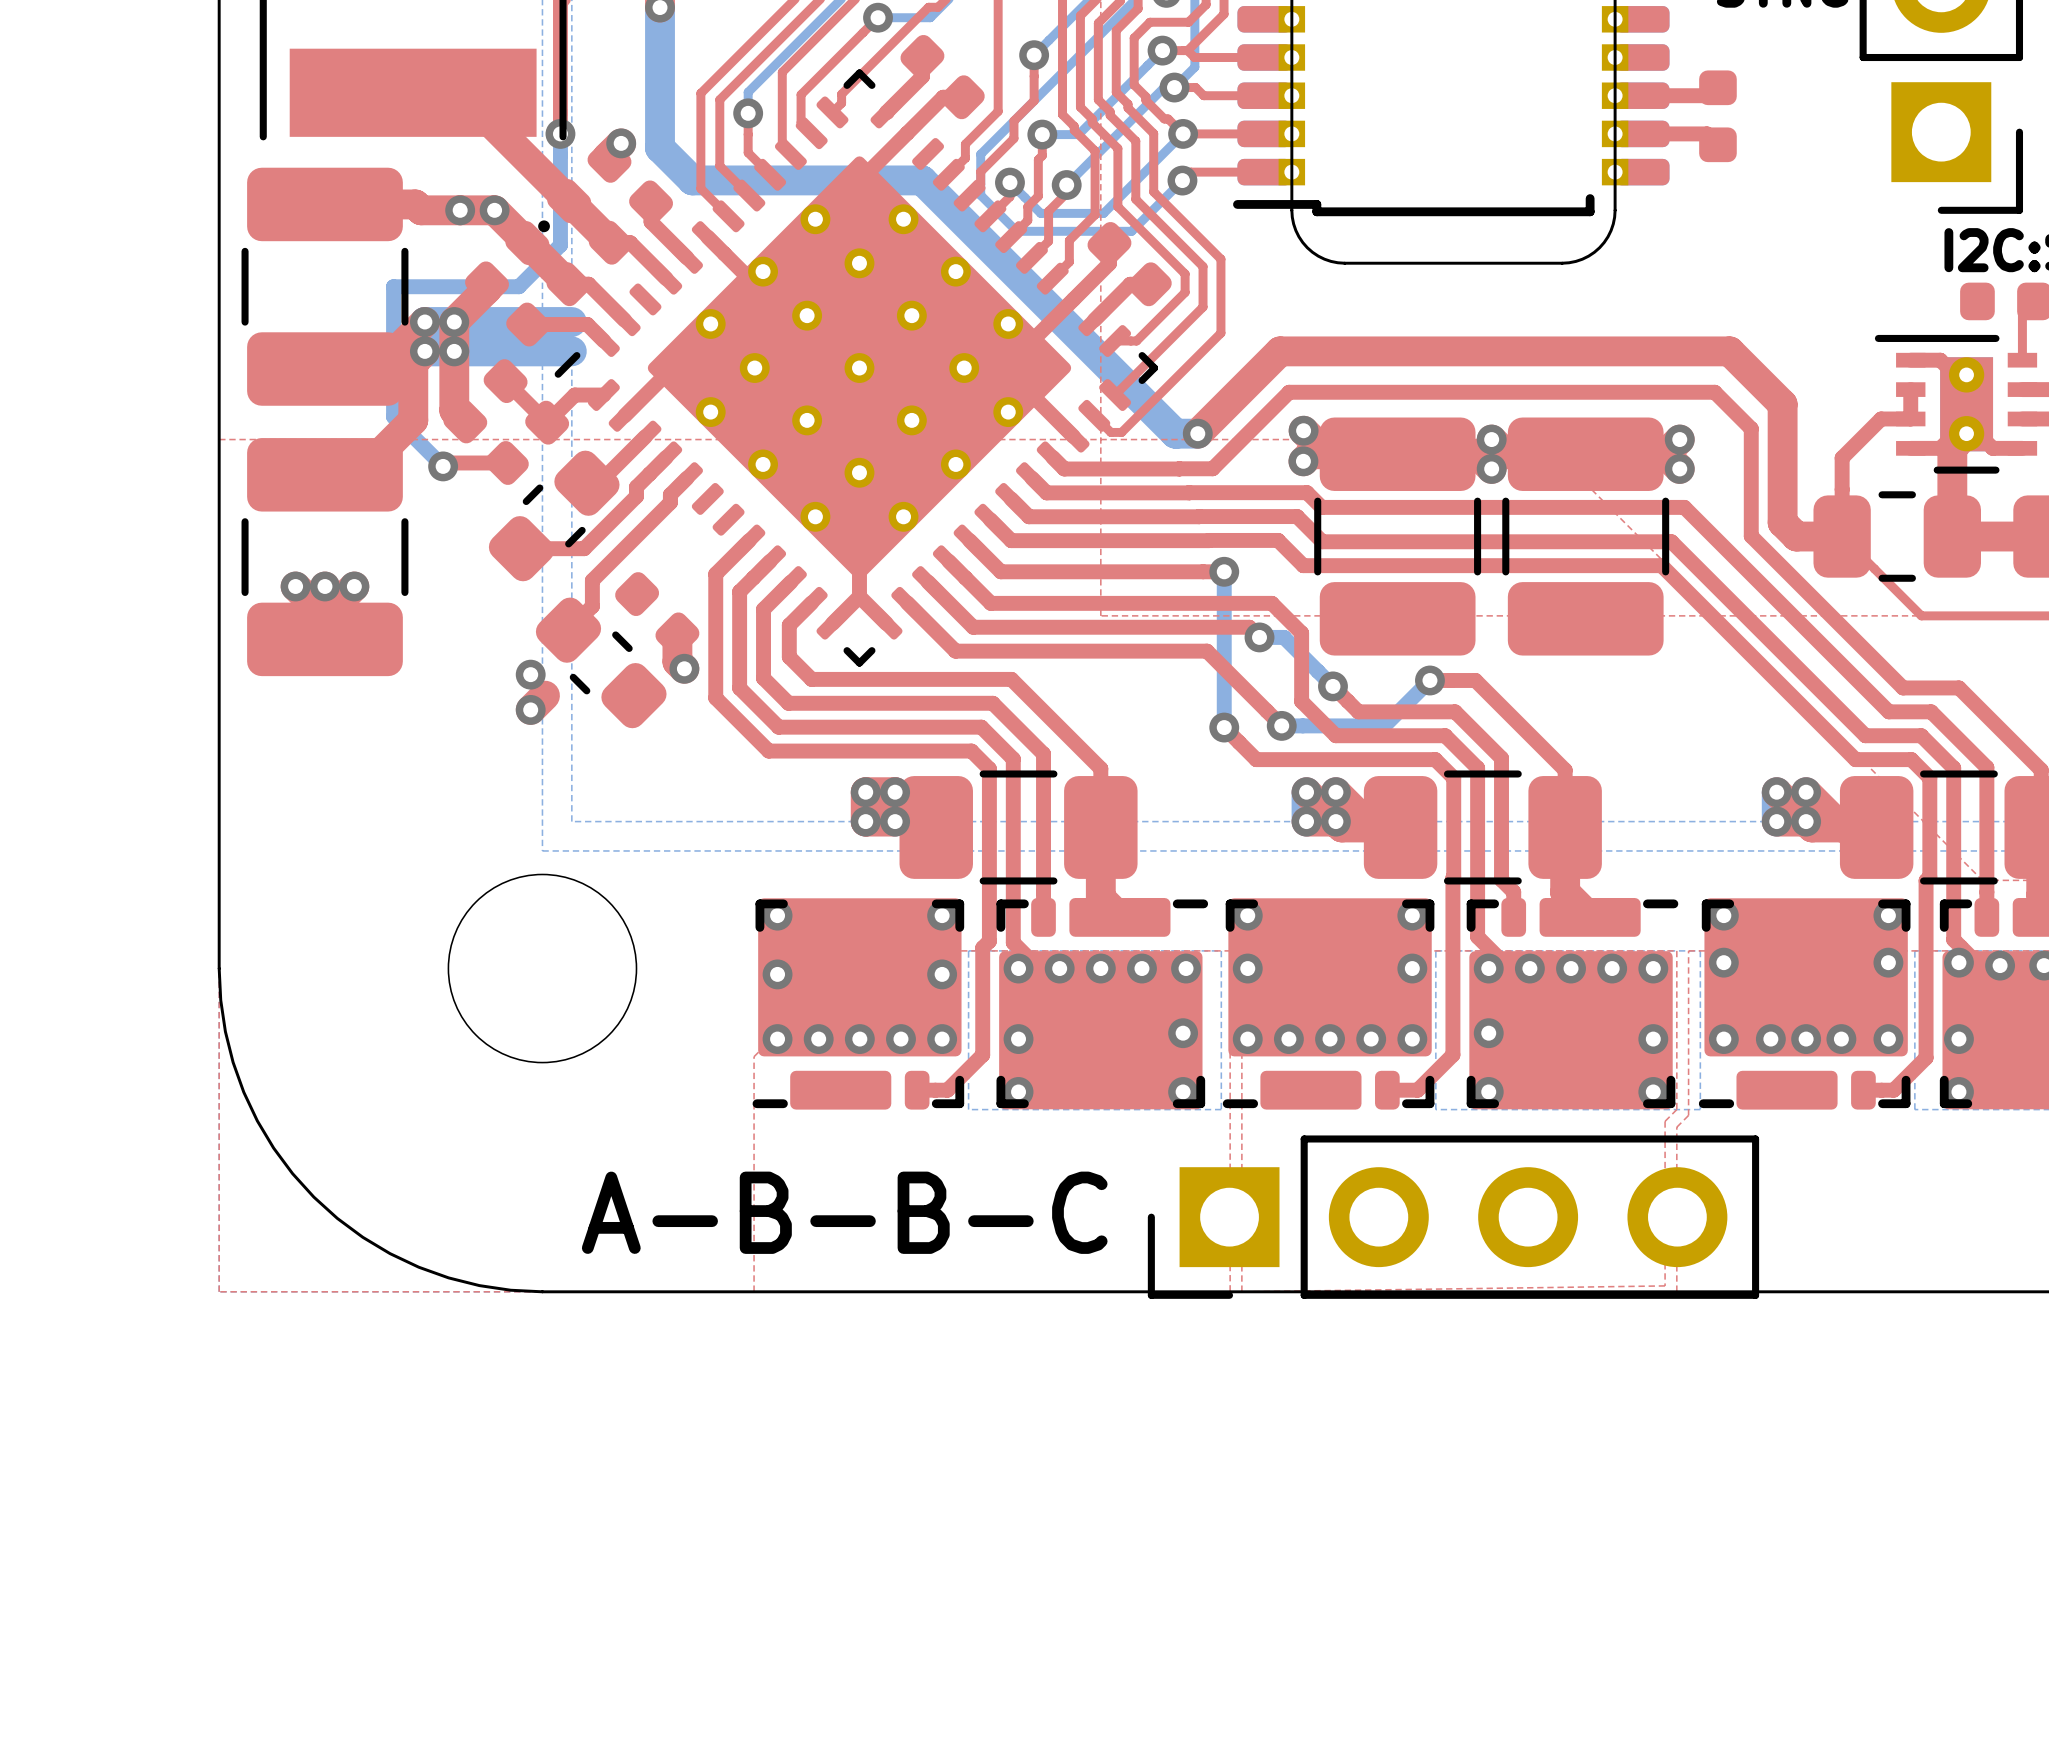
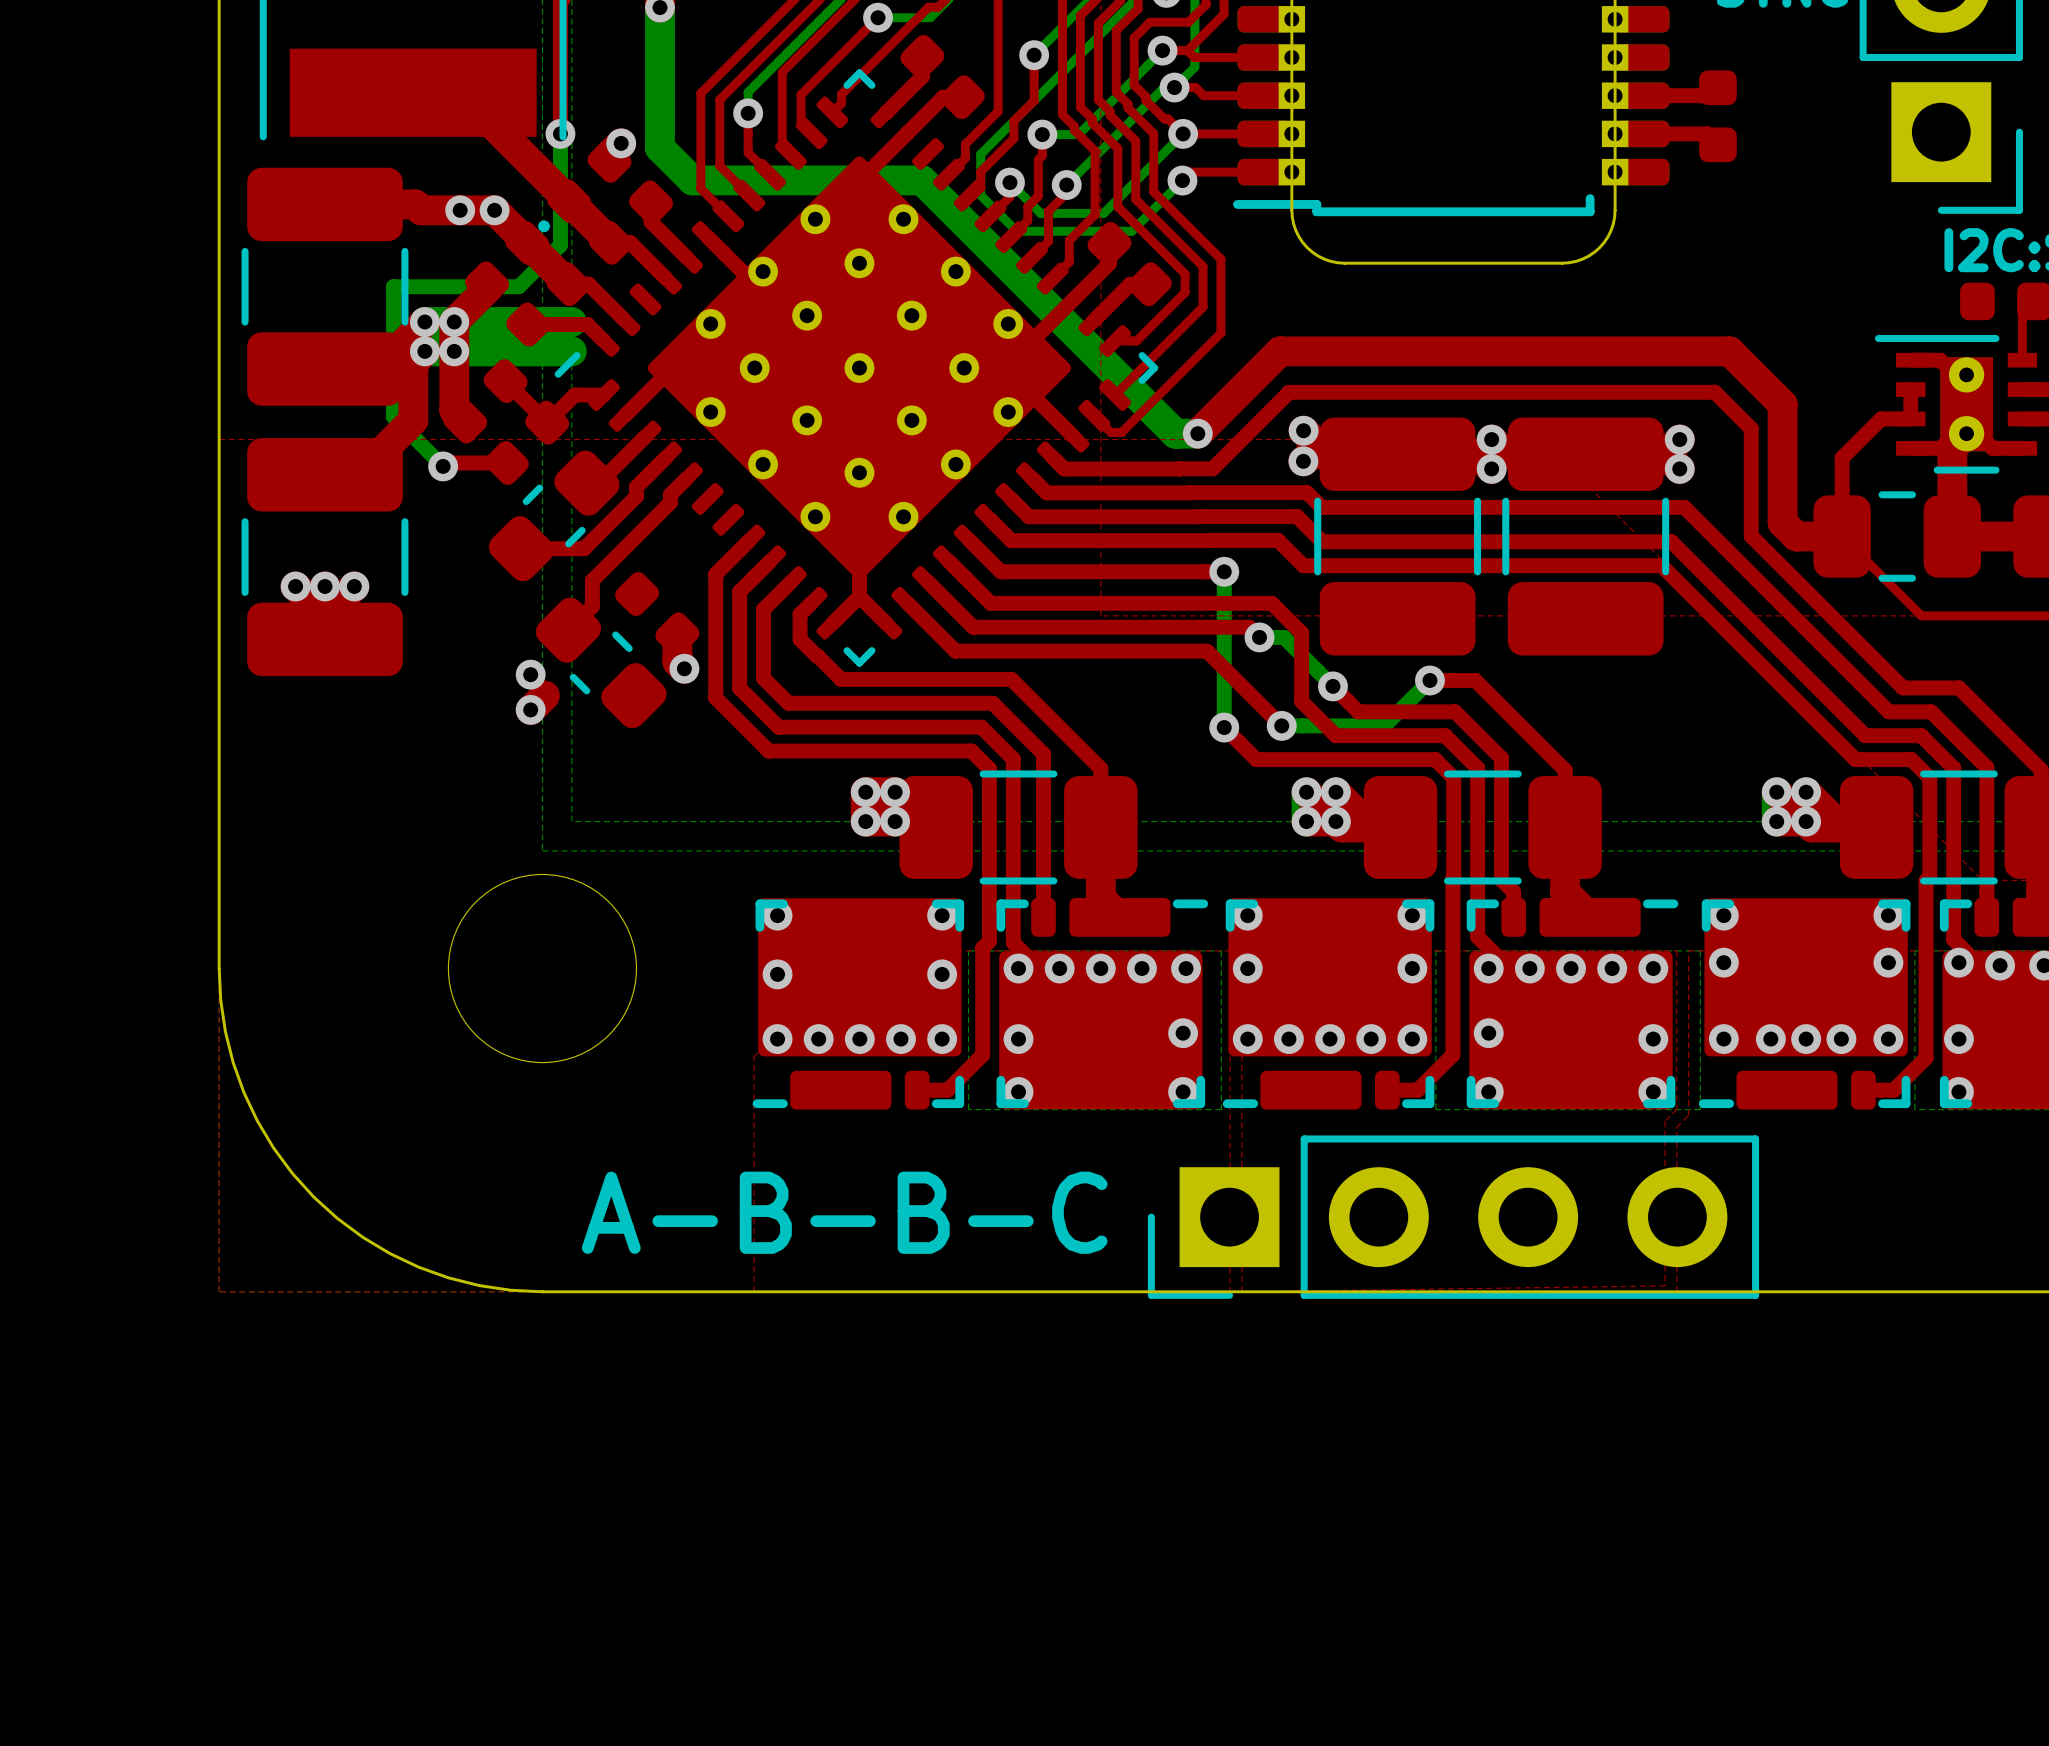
top track: (800, 614) (789, 625) (789, 657) (811, 679) (841, 679) -> (800, 614) (800, 639) (816, 656)
top track: none -> (817, 656) (841, 679)

